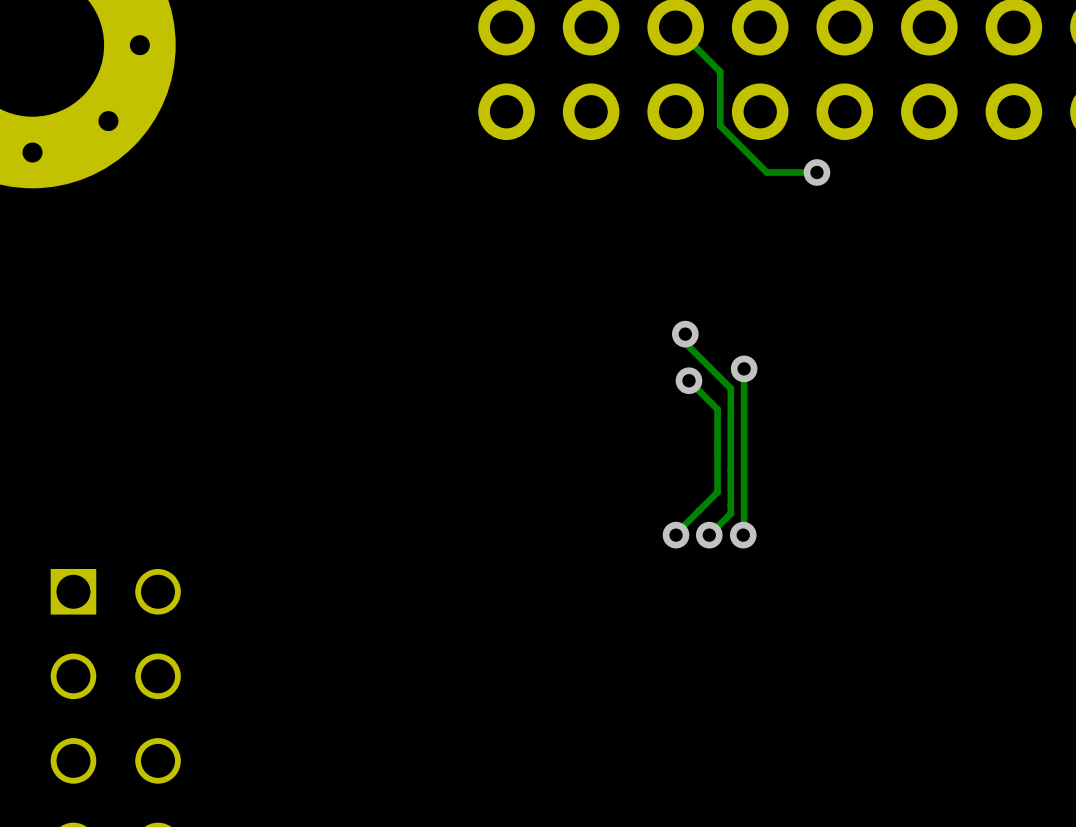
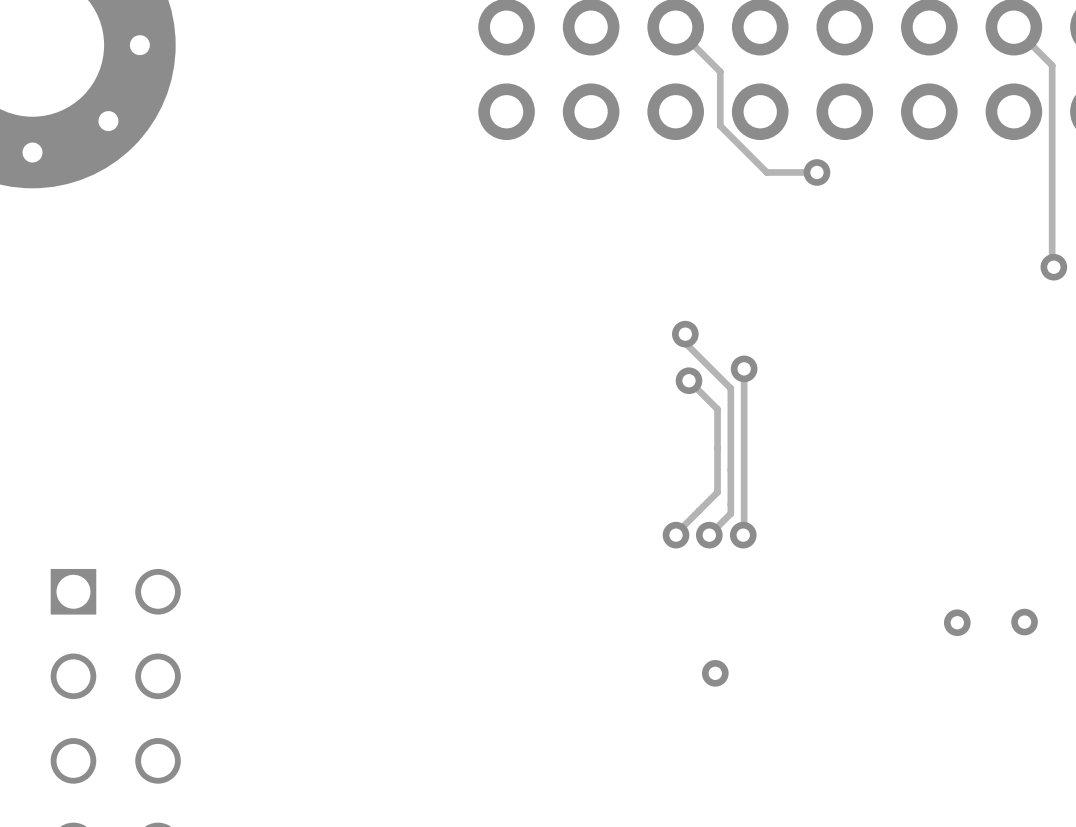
track: none -> (1013, 27) (1052, 65) (1052, 265) (1053, 267)
via: none -> (1053, 267)
via: none -> (957, 622)
via: none -> (1024, 622)
via: none -> (715, 673)

